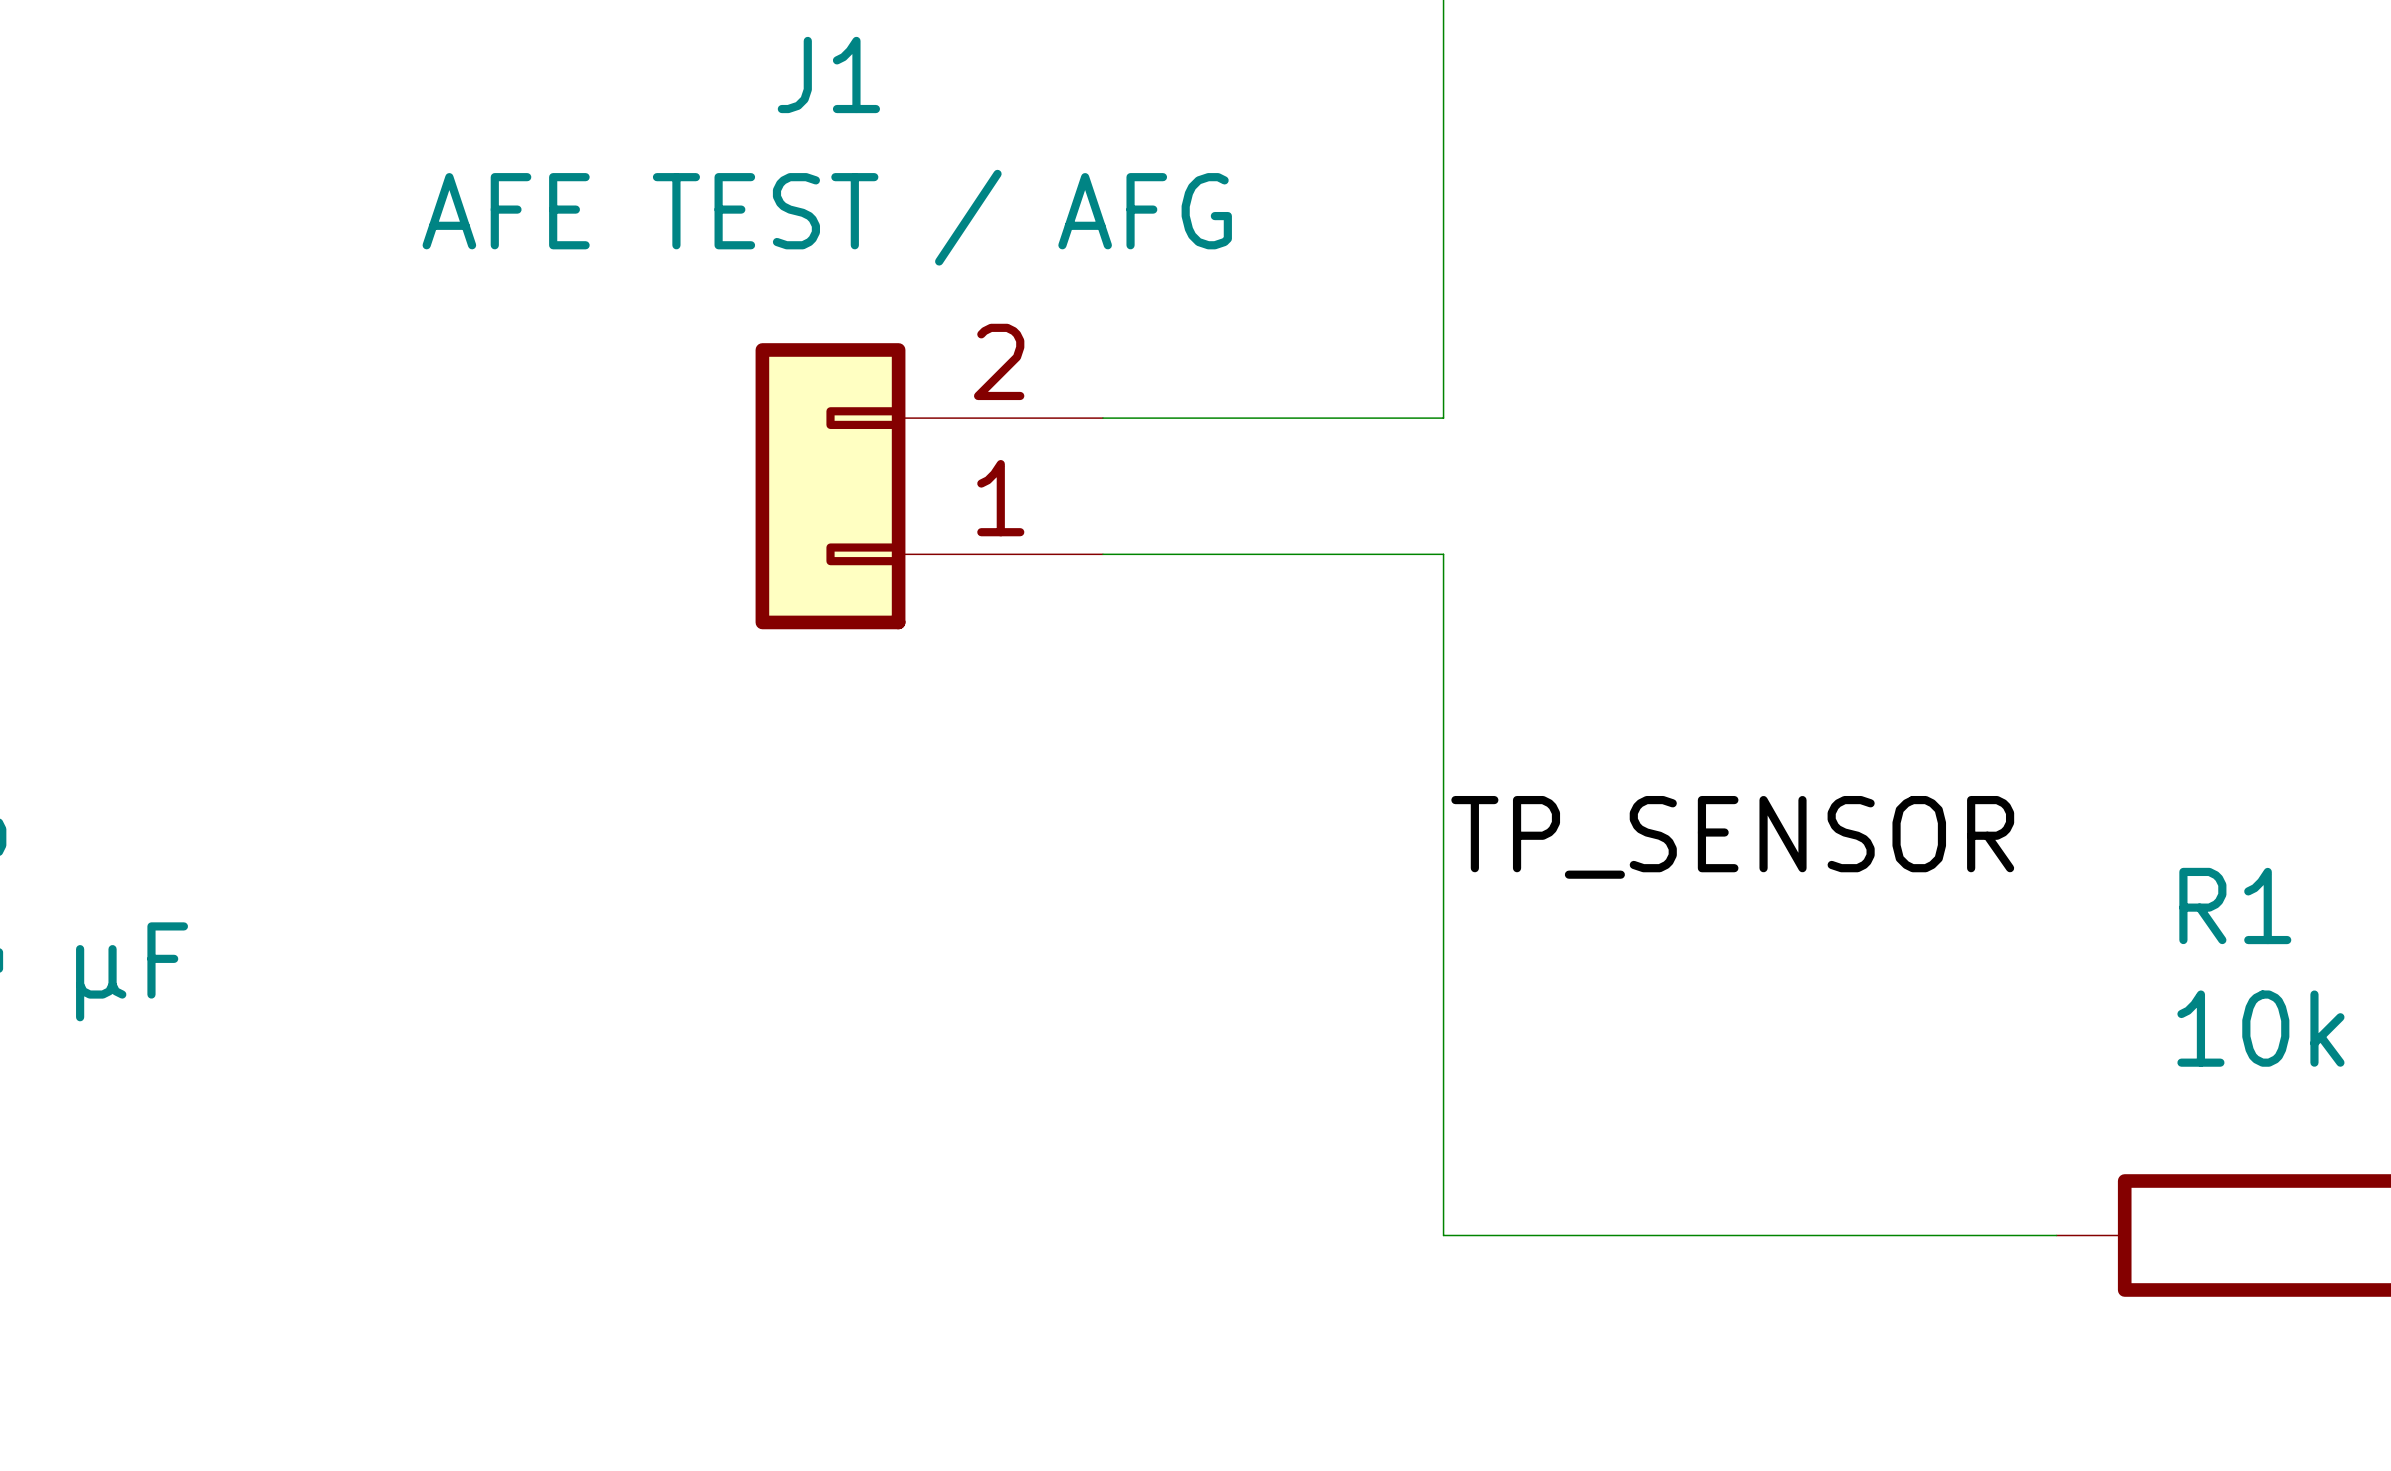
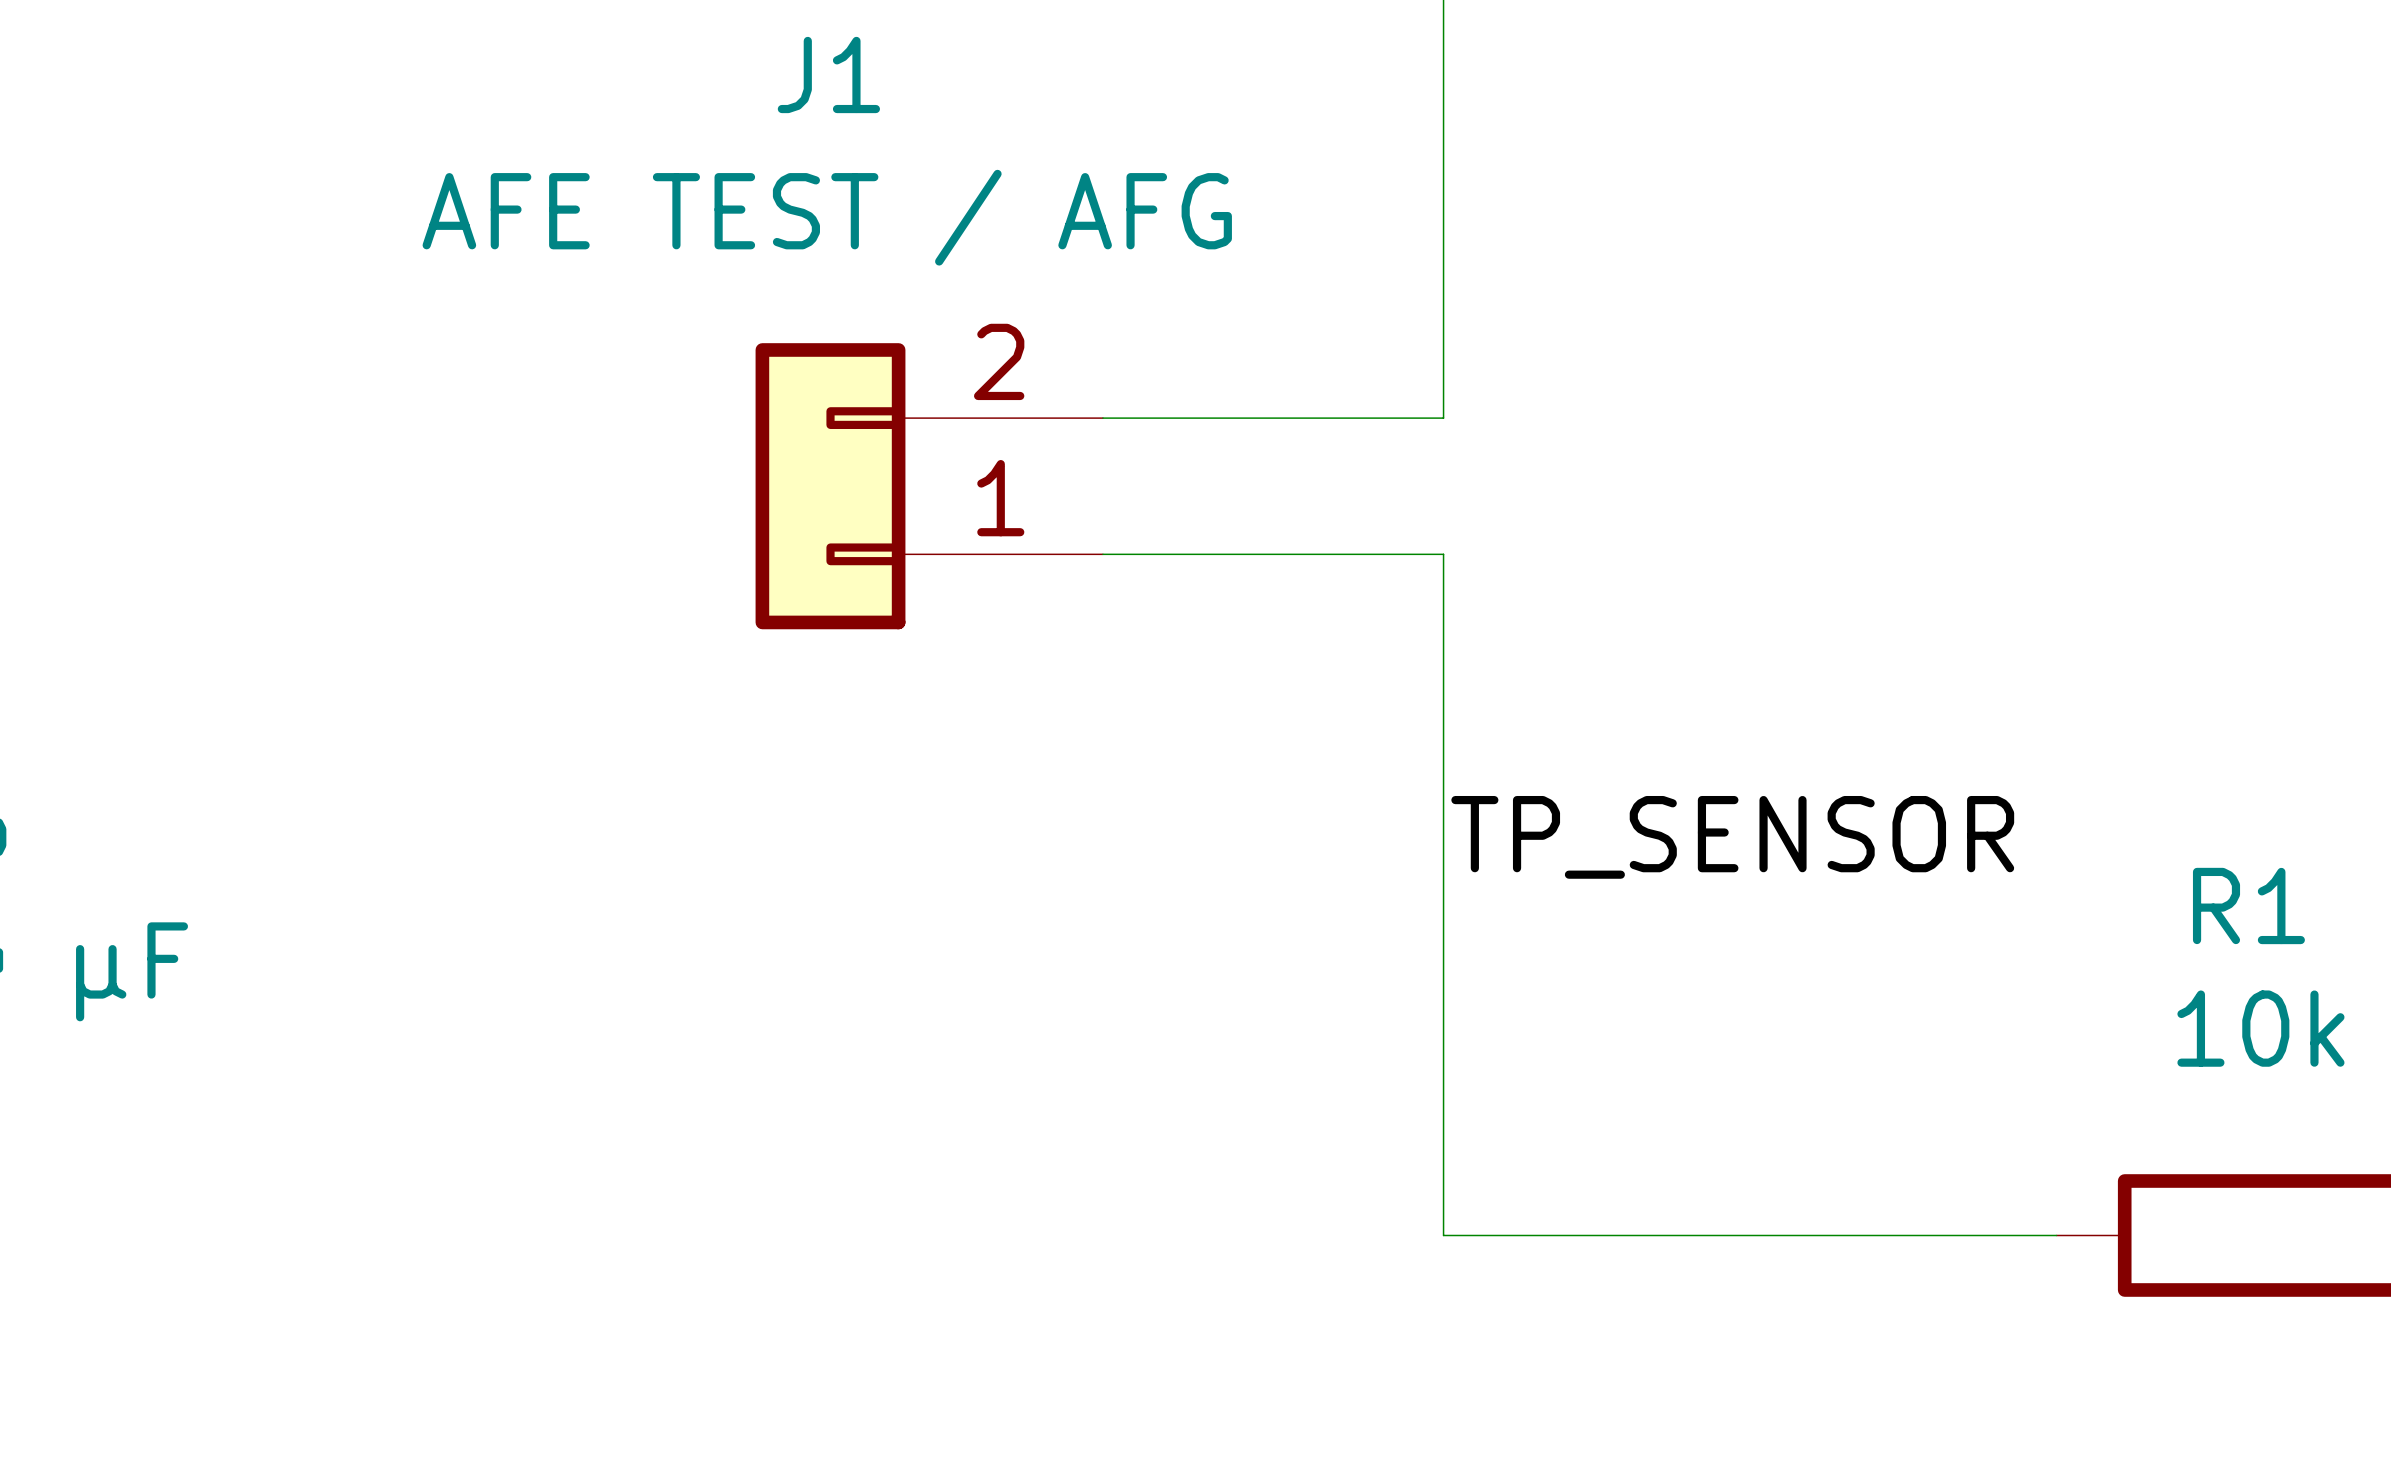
R1 name position: R1 (2235, 905) -> R1 (2248, 905)

